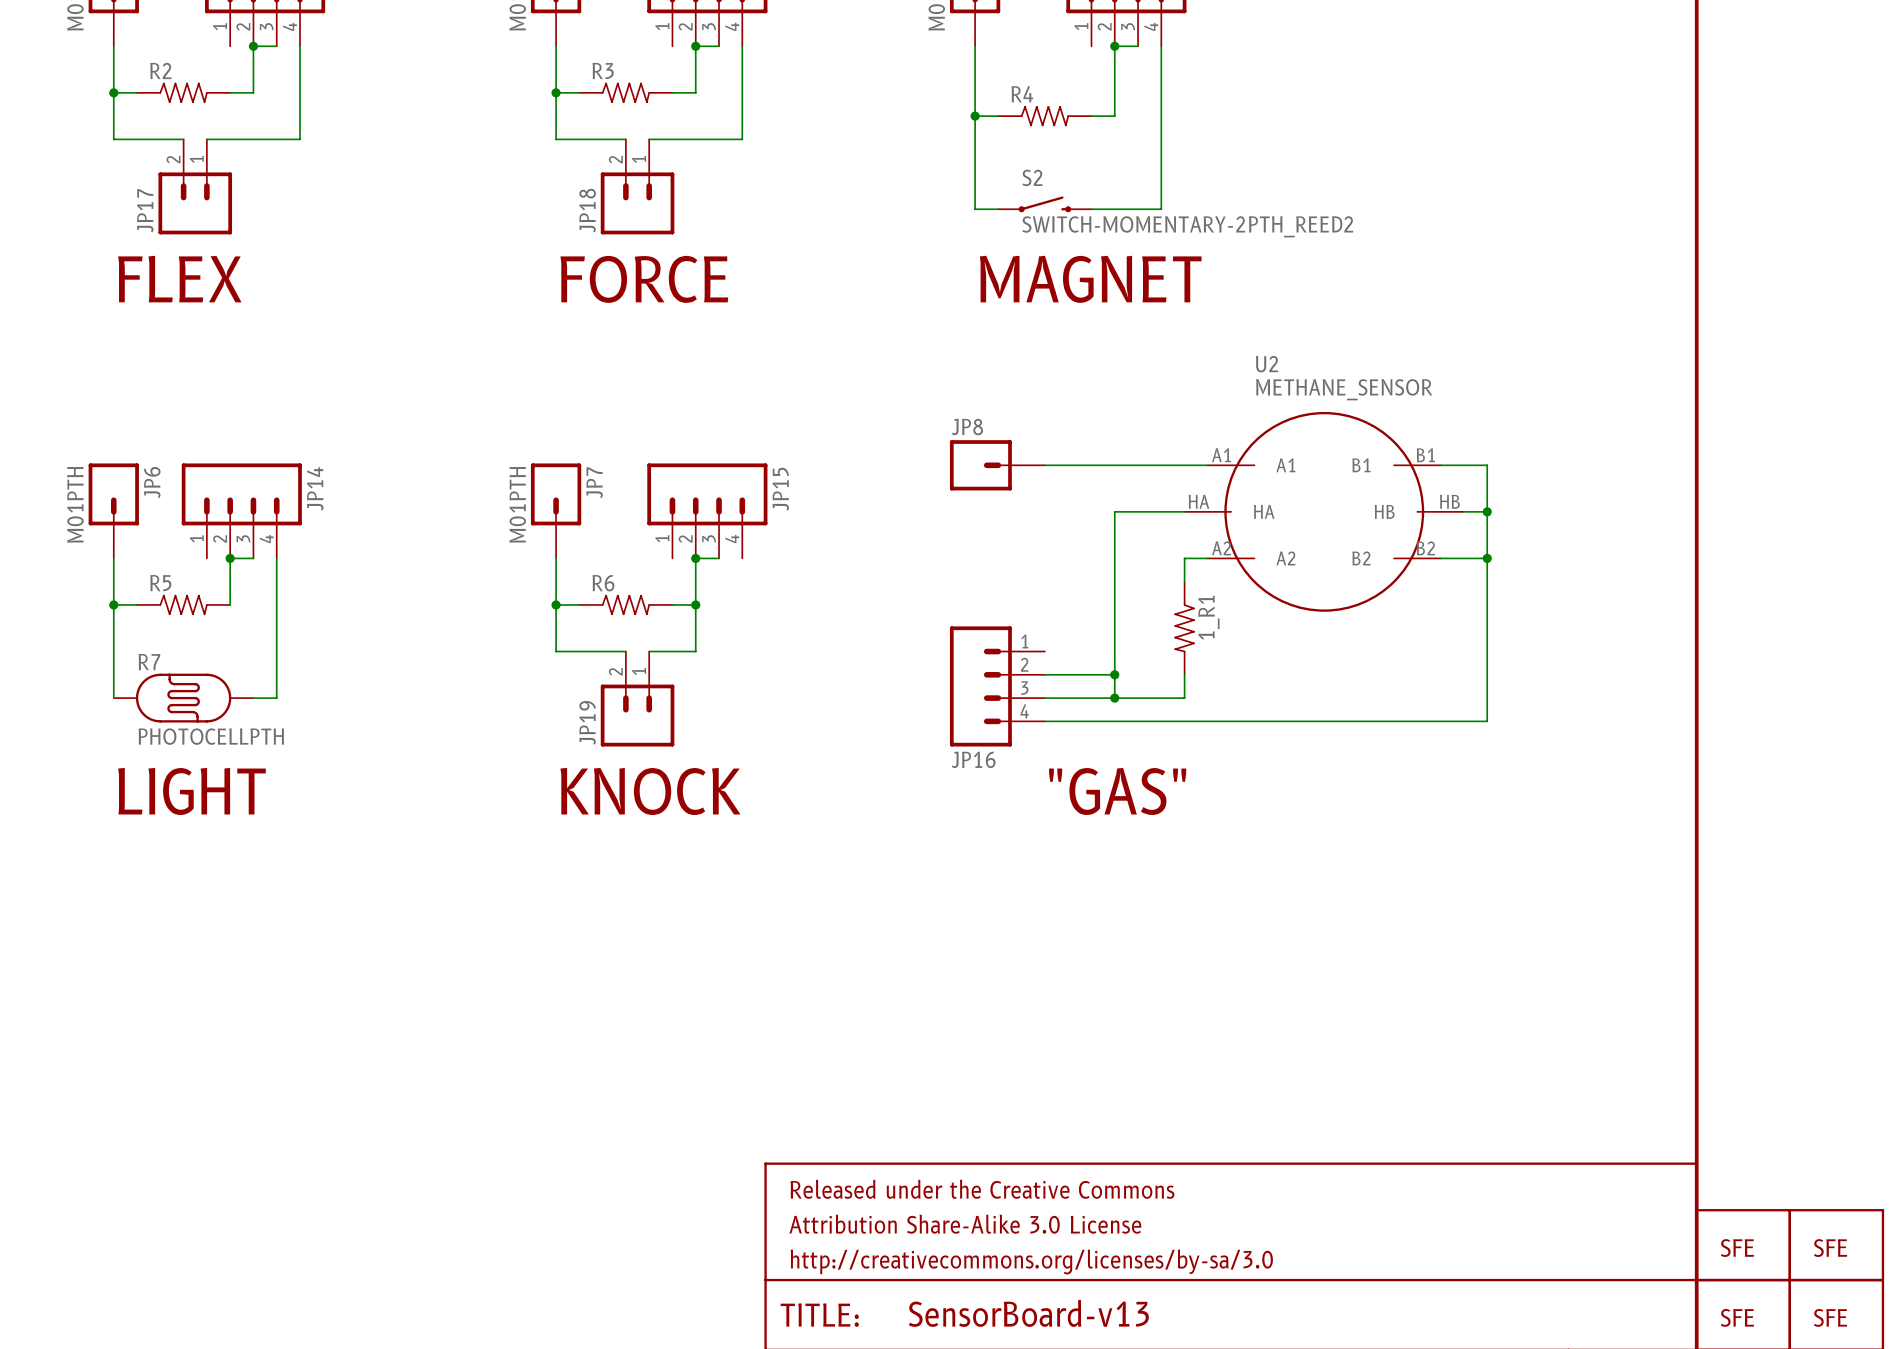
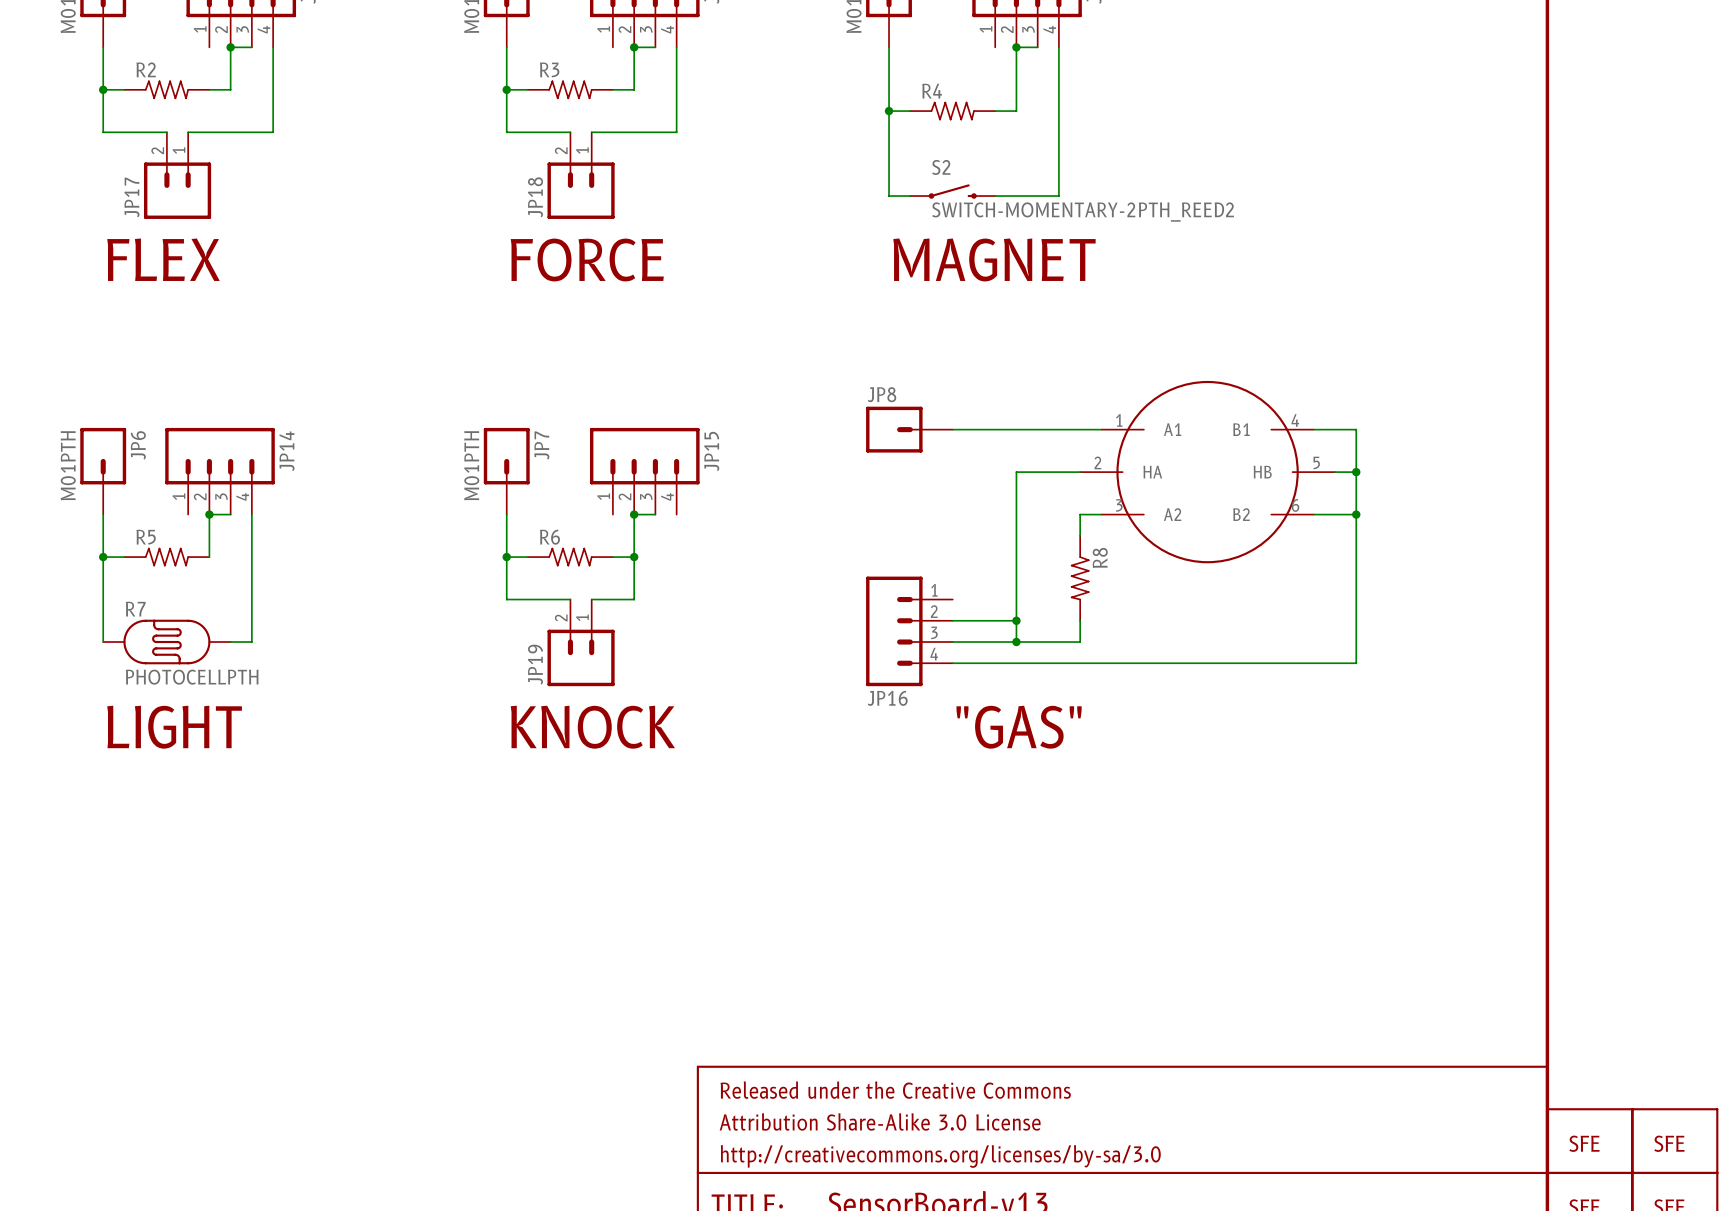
U2 name: U2 (1267, 364) -> none
U2 value: METHANE_SENSOR (1344, 389) -> none
U2 pin number: A1 (1221, 455) -> 1 (1119, 420)
U2 pin number: B1 (1425, 455) -> 4 (1295, 420)
U2 pin number: HA (1198, 501) -> 2 (1097, 462)
U2 pin number: HB (1449, 501) -> 5 (1316, 462)
U2 pin number: A2 (1221, 548) -> 3 (1119, 505)
U2 pin number: B2 (1425, 548) -> 6 (1295, 505)
1_R1 name: 1_R1 (1208, 617) -> R8 (1100, 557)

